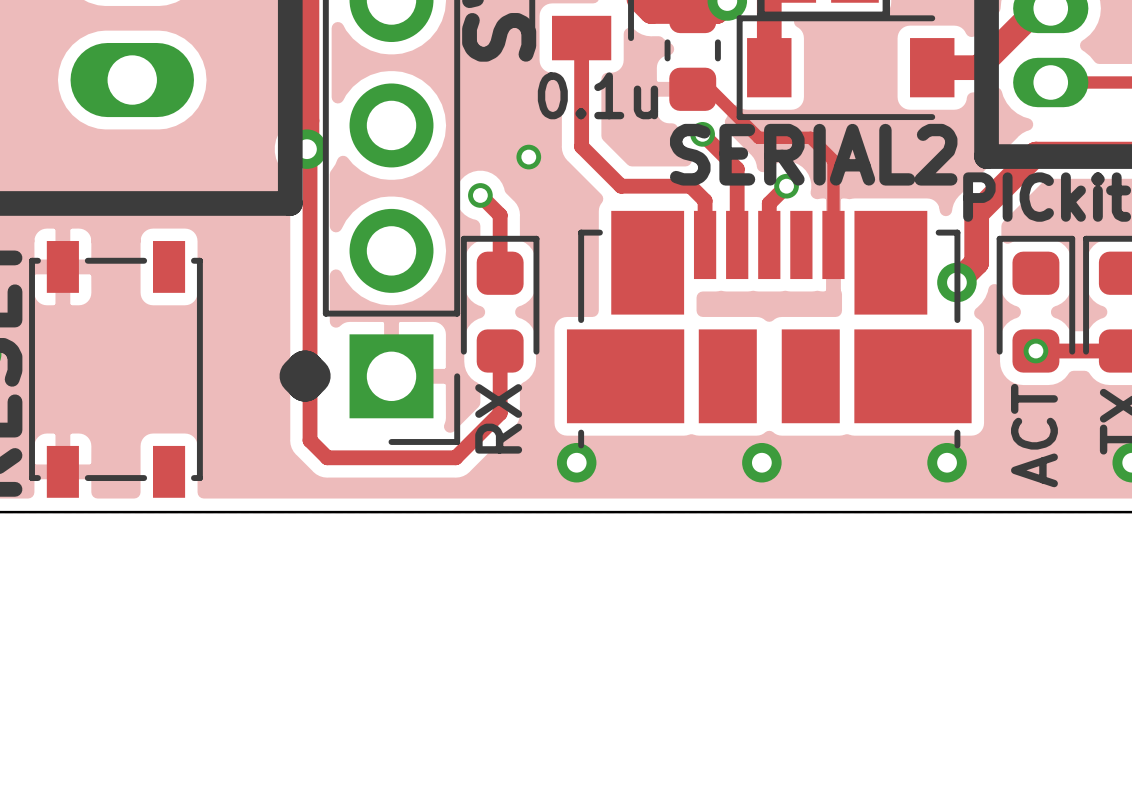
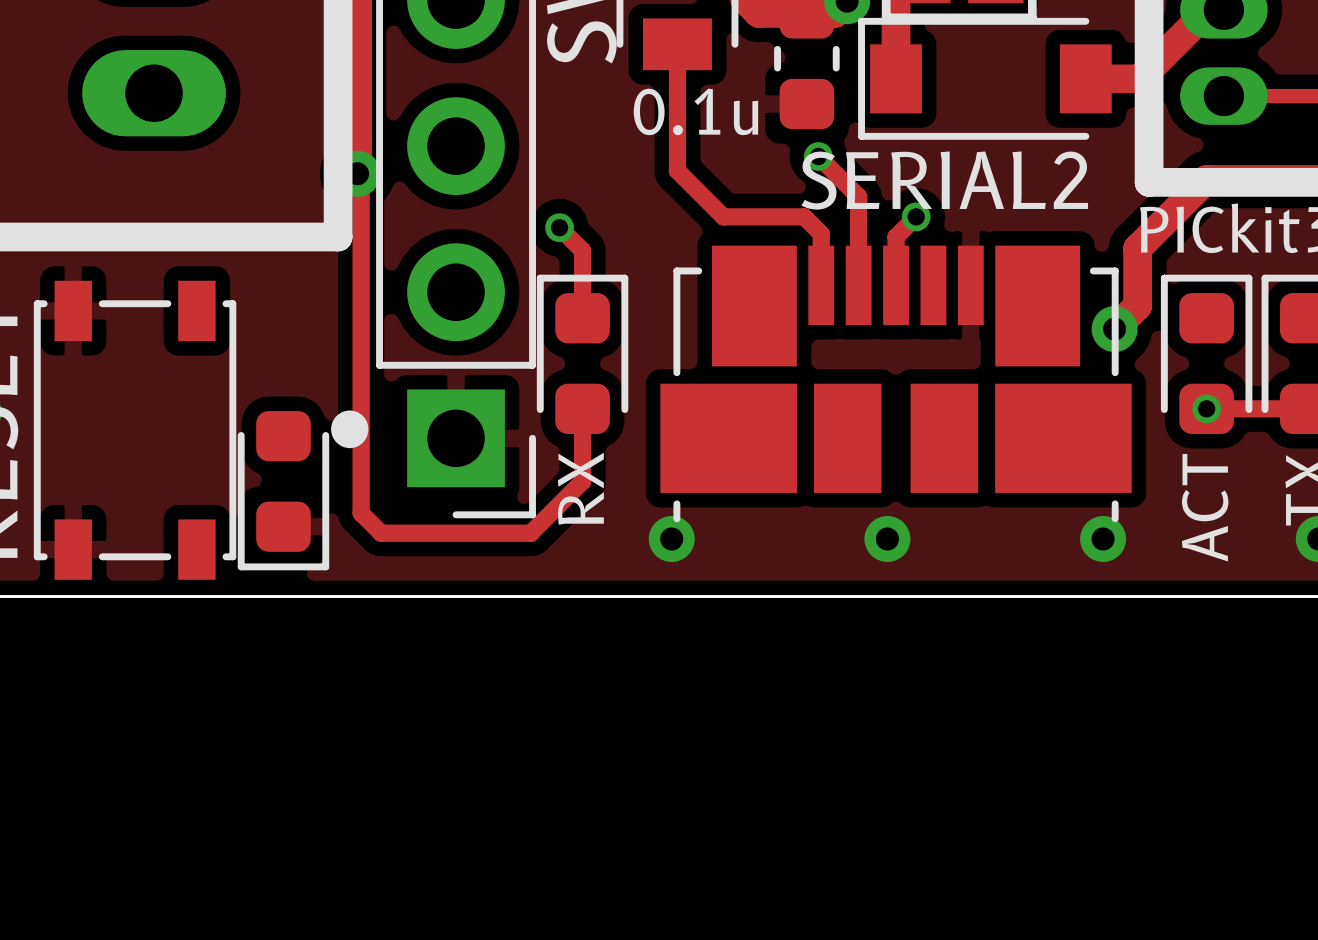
track: (692, 89) (710, 89) (758, 137) (810, 137) (833, 160) (833, 244) -> none
via: (528, 157) -> none
part: none -> (283, 490)

